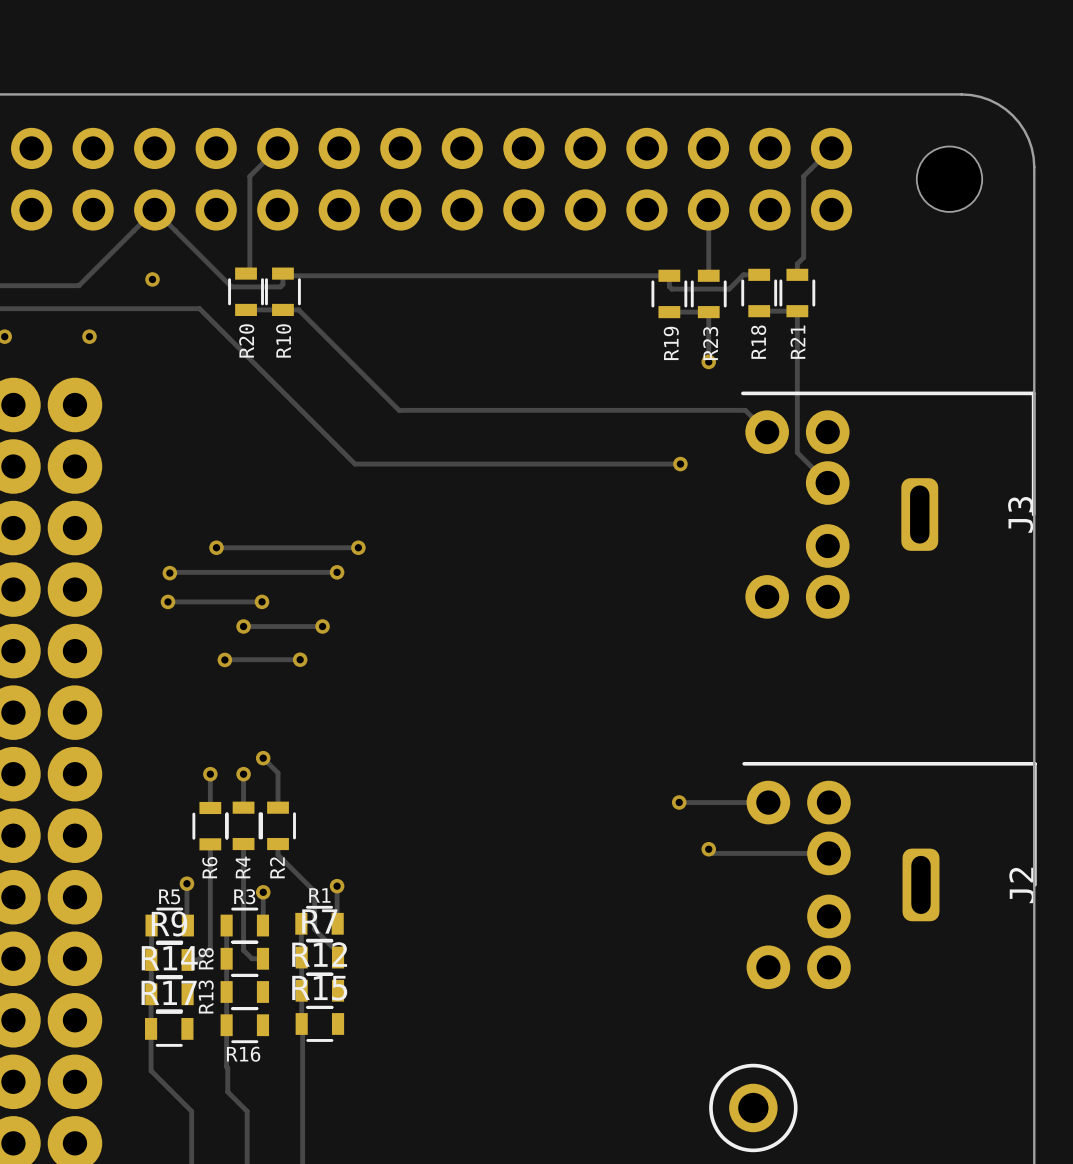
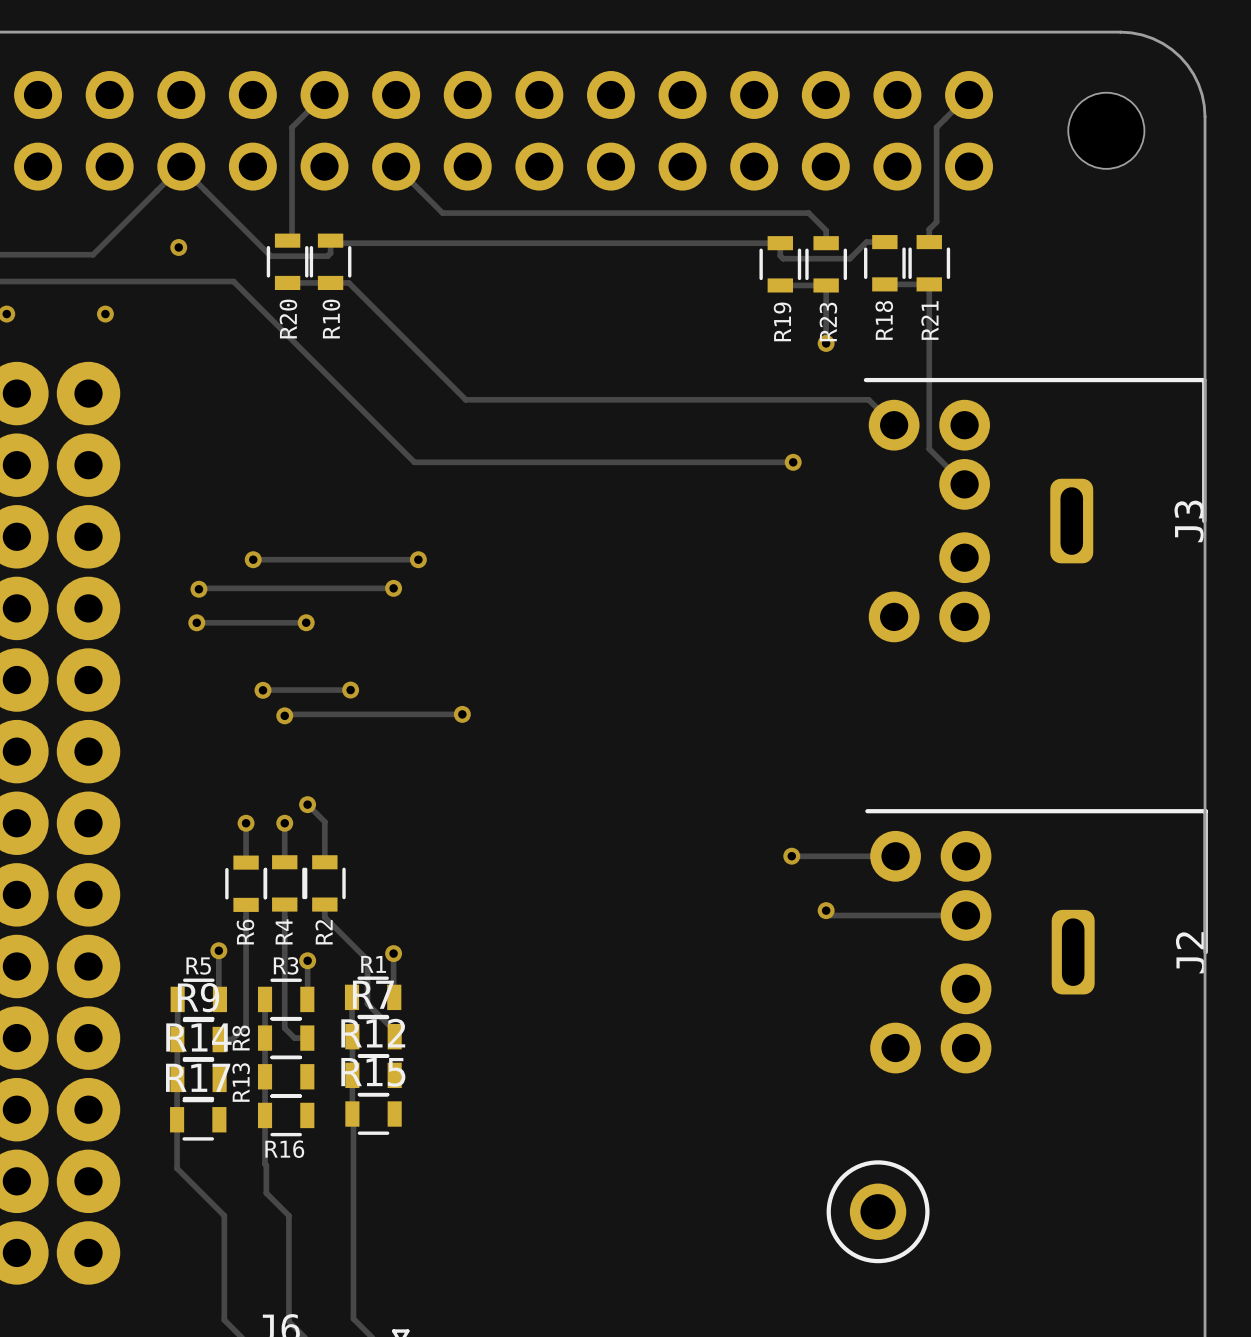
track: (708, 210) (708, 264) -> (396, 166) (442, 213) (808, 213) (826, 230)
track: (243, 626) (322, 626) -> none
via: (243, 626) -> none
via: (322, 626) -> none
track: none -> (462, 714) (284, 715)
via: none -> (462, 714)
via: none -> (284, 715)

